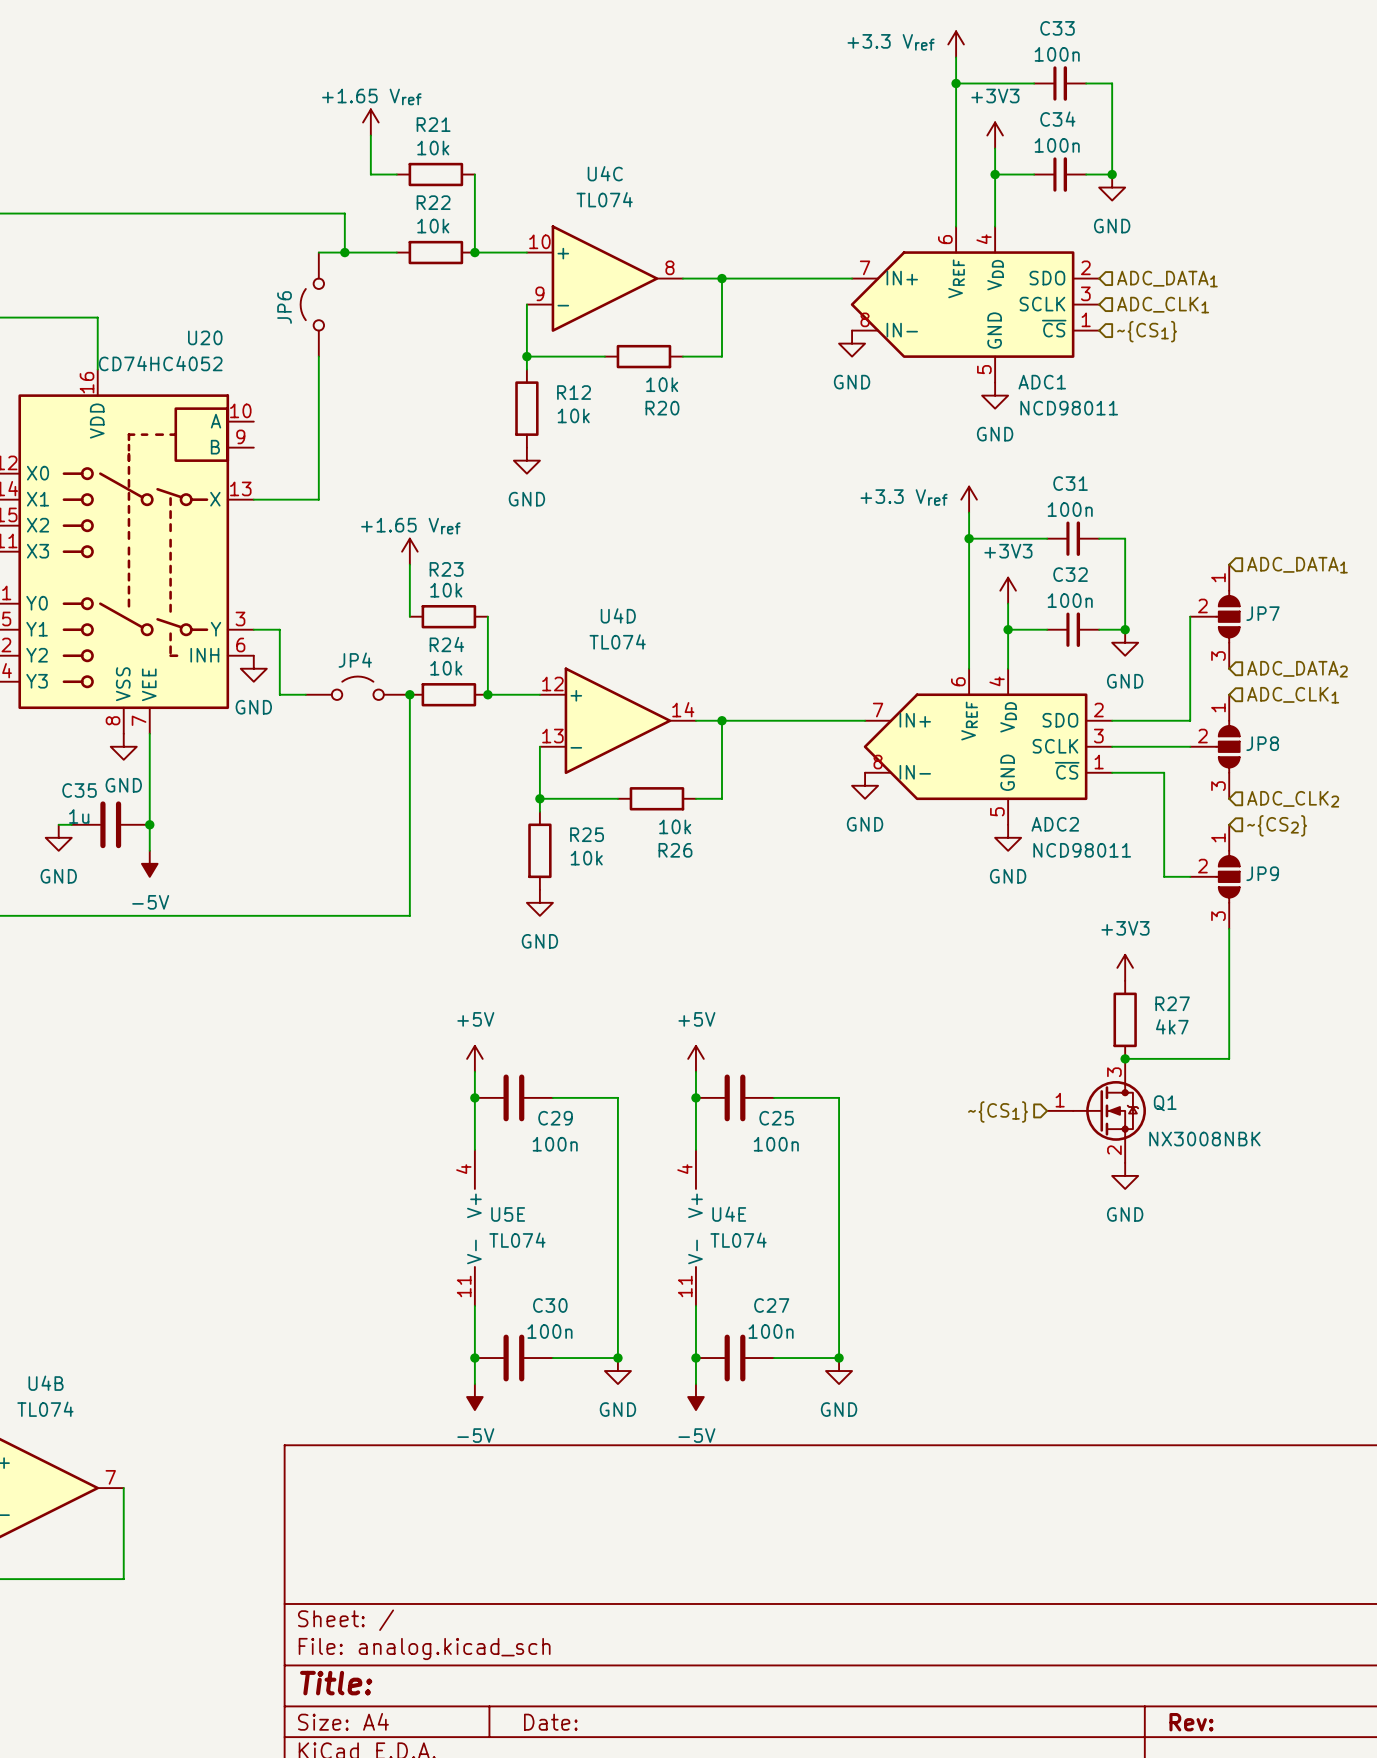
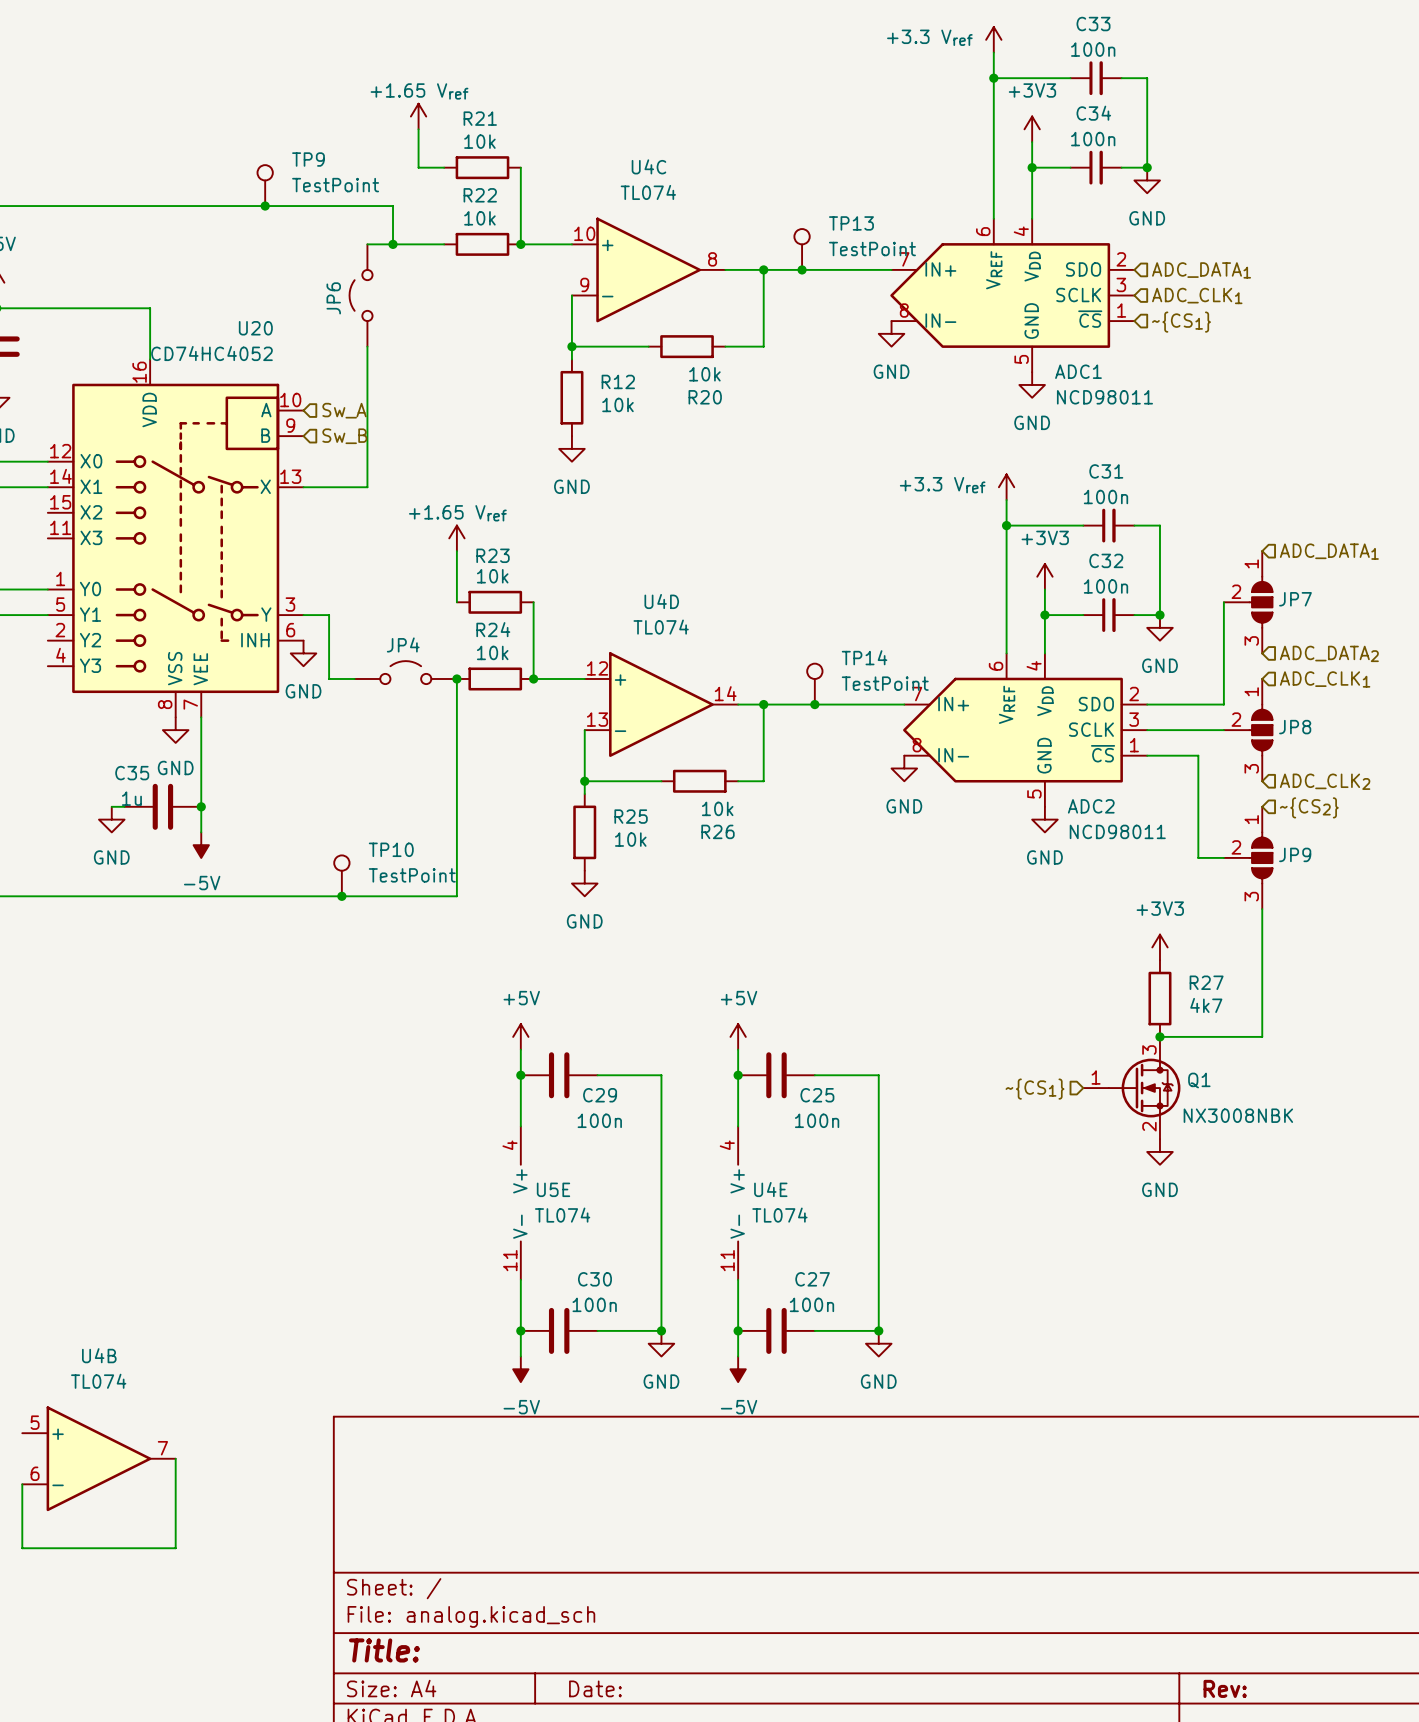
TP9: none -> TestPoint (265, 185)
junction: none -> (265, 206)
TP13: none -> TestPoint (802, 249)
junction: none -> (802, 269)
hierarchical label: none -> Sw_A (344, 410)
hierarchical label: none -> Sw_B (344, 436)
TP14: none -> TestPoint (814, 684)
junction: none -> (814, 704)
TP10: none -> TestPoint (341, 875)
junction: none -> (341, 896)

